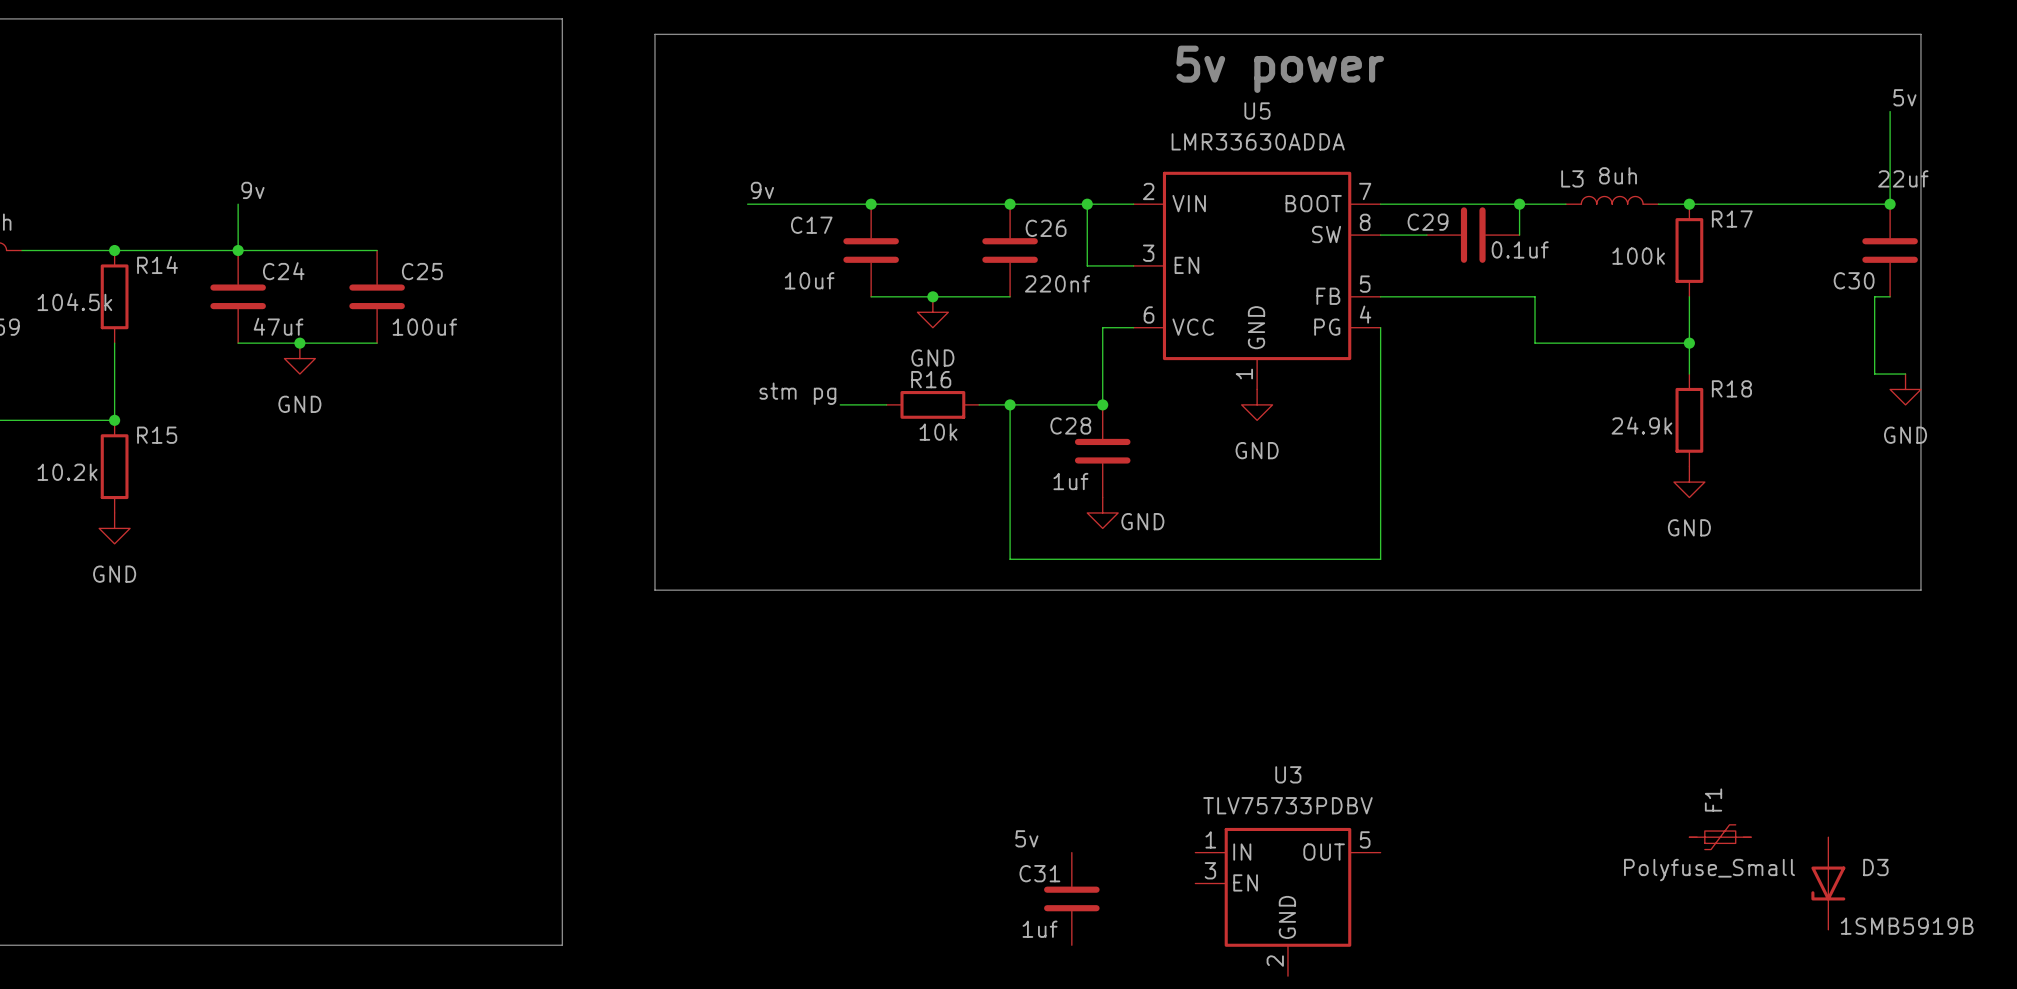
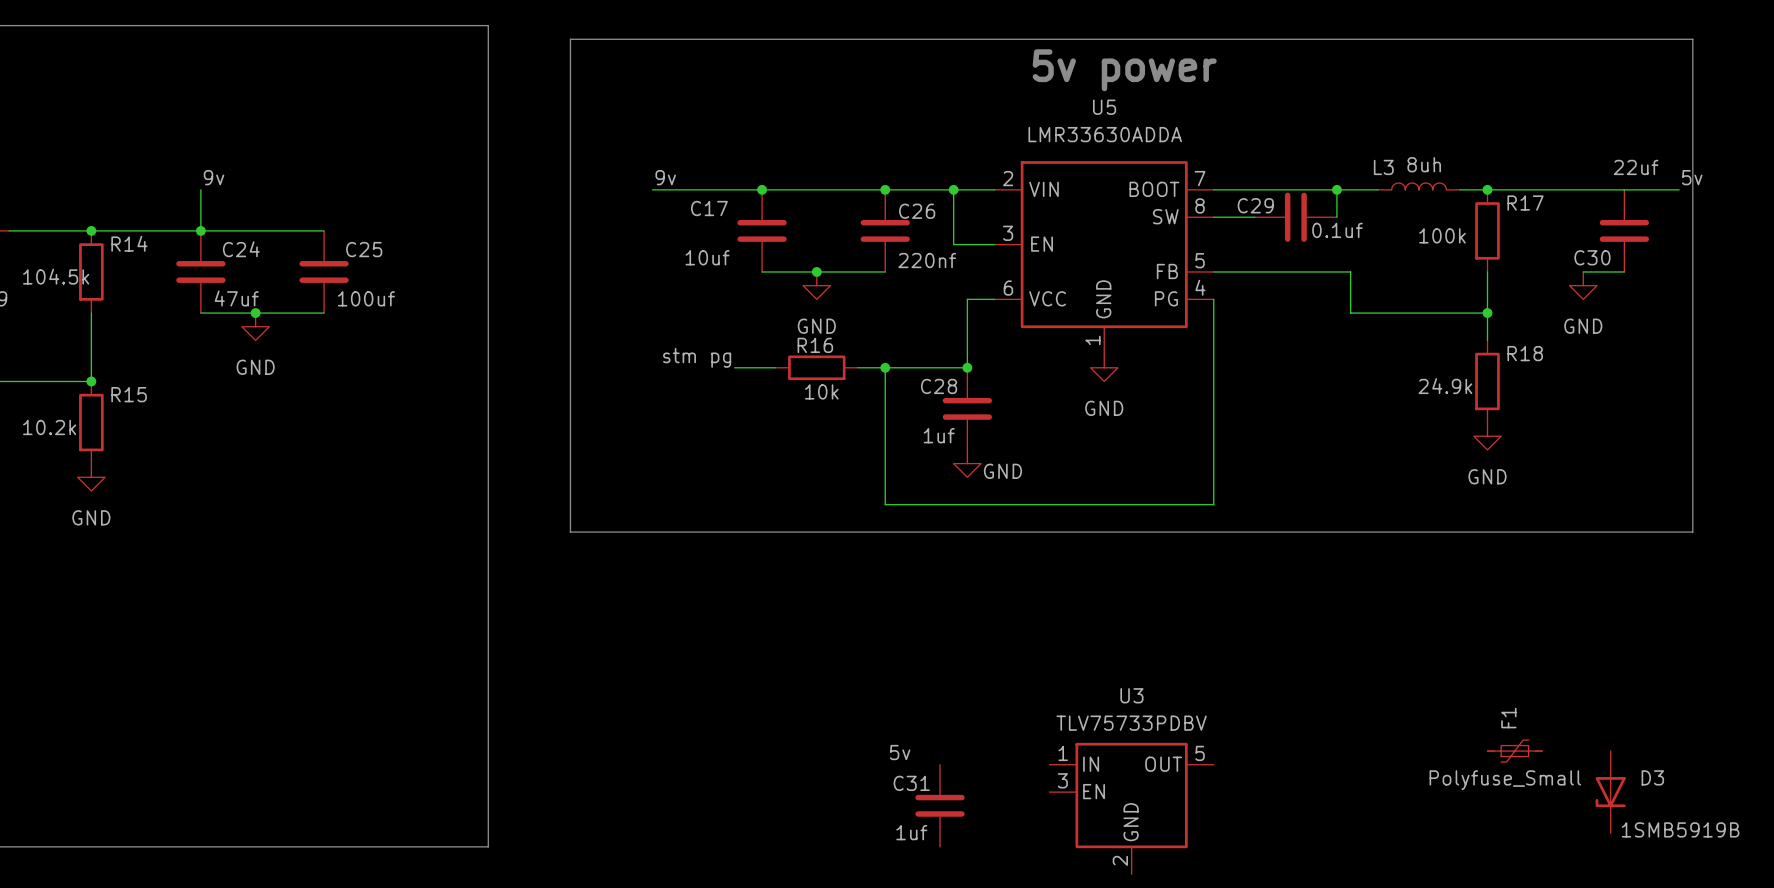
label position: 5v (1904, 97) -> 5v (1692, 177)
wire: (1890, 111) (1890, 204) -> (1679, 189) (1665, 189)
junction: (1890, 204) -> none
C30 position: (1890, 250) -> (1624, 230)
wire: none -> (1583, 271) (1624, 271)
wire: (1890, 296) (1874, 296) (1874, 374) (1905, 374) -> none
power symbol position: GND (1905, 389) -> GND (1583, 285)

